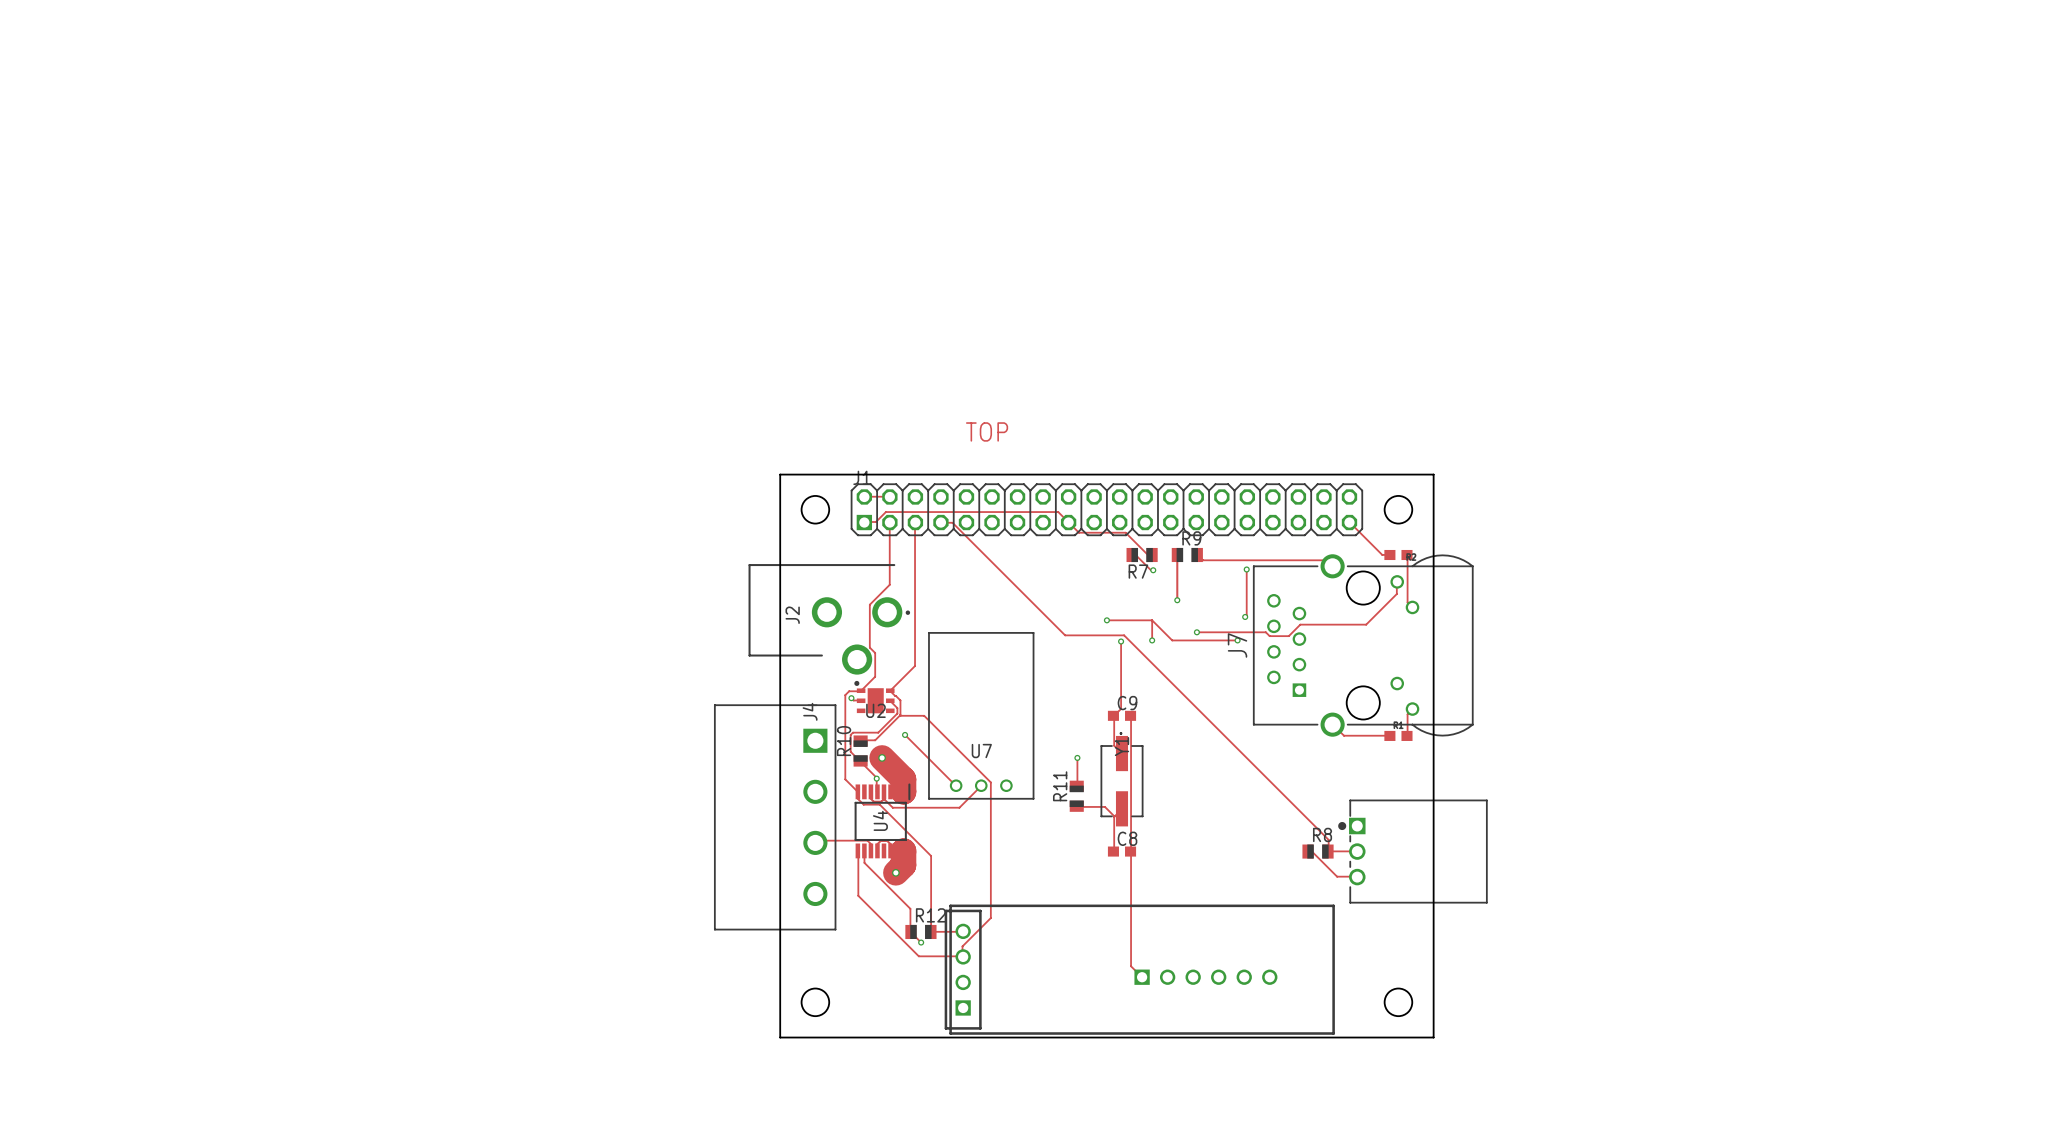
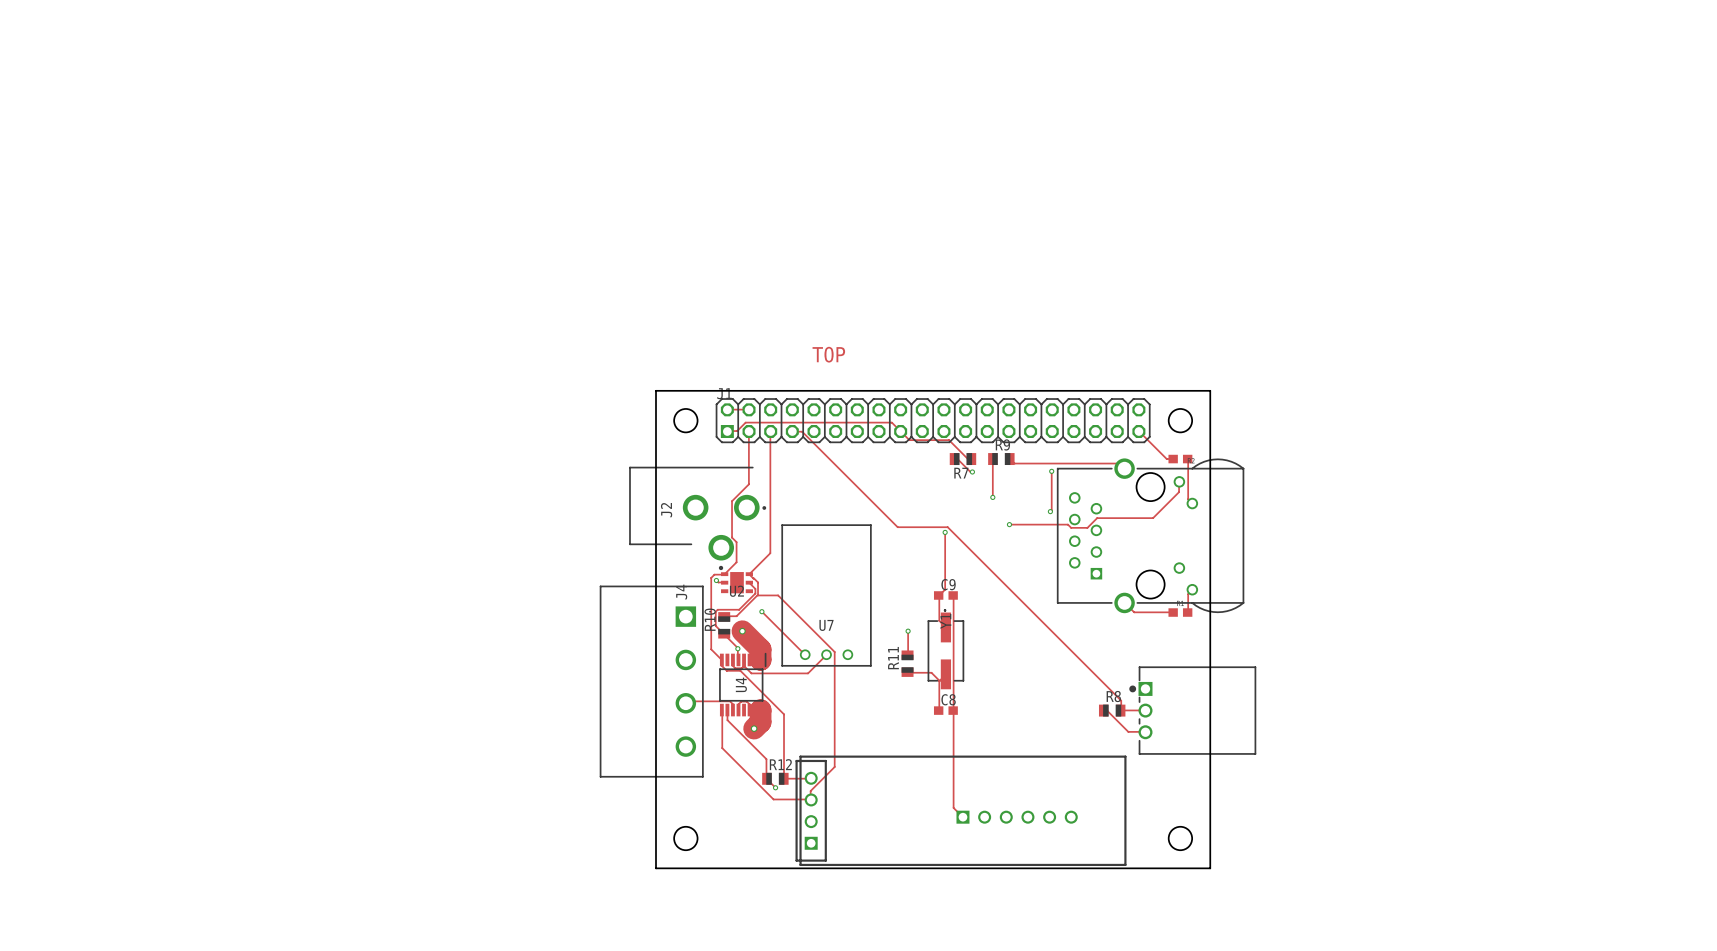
track: (1106, 620) (1152, 620) -> none
via: (1106, 620) -> none
track: (1152, 620) (1152, 640) -> none
track: (1152, 620) (1172, 640) (1237, 640) -> none
via: (1152, 640) -> none
via: (1237, 640) -> none
J7 name: J7 (1237, 645) -> none

